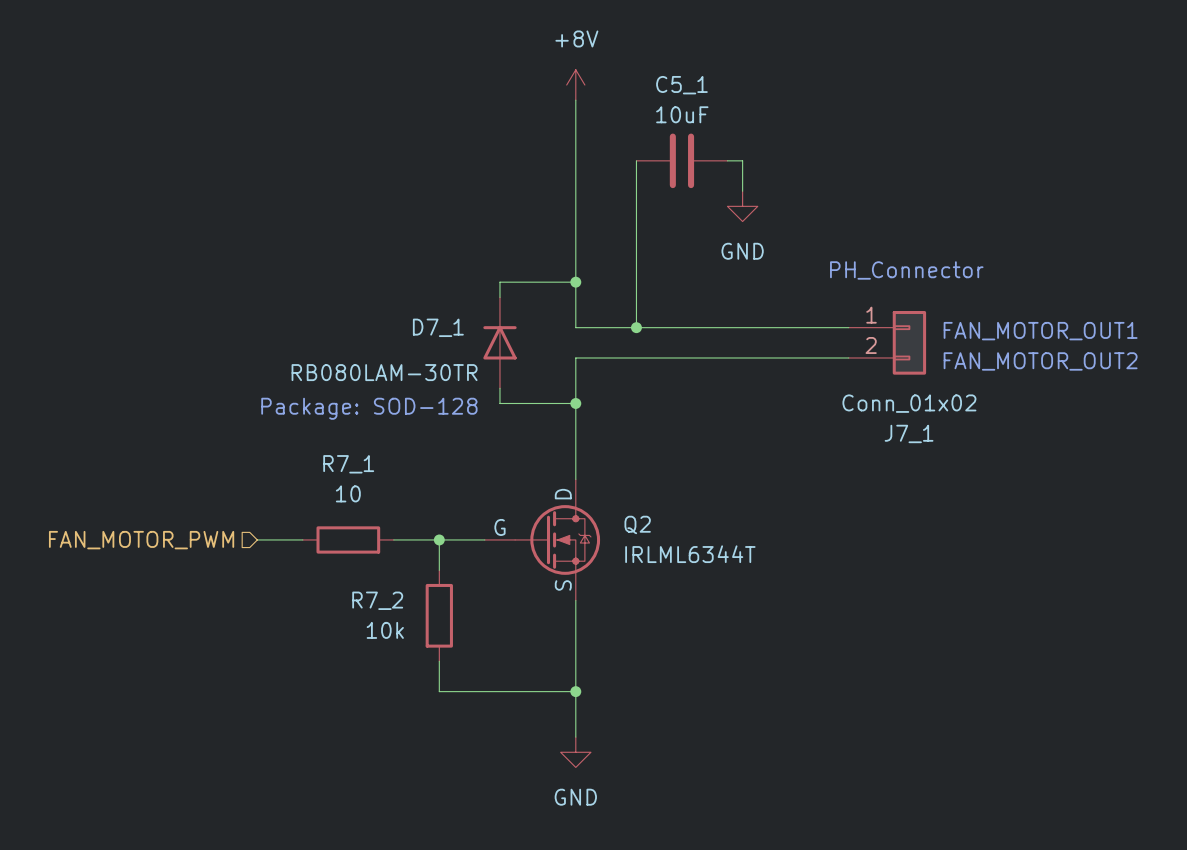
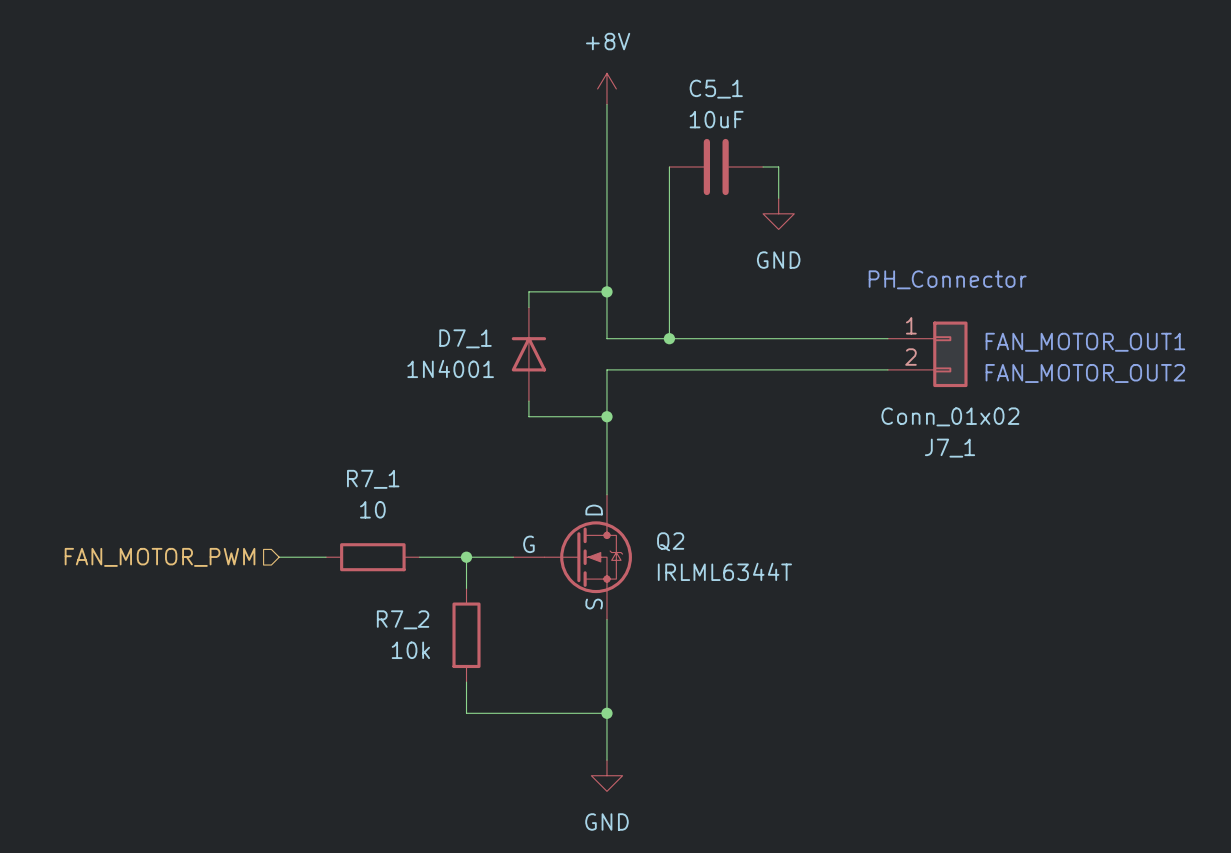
D7_1 value: RB080LAM-30TR (384, 372) -> 1N4001 (450, 368)
text: Package: SOD-128 (369, 408) -> none

